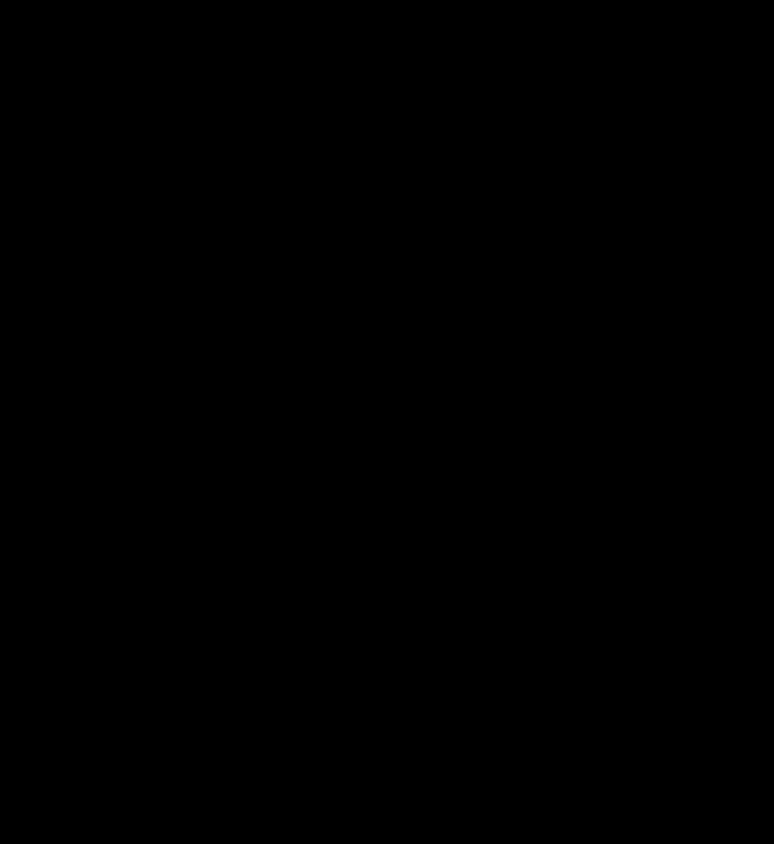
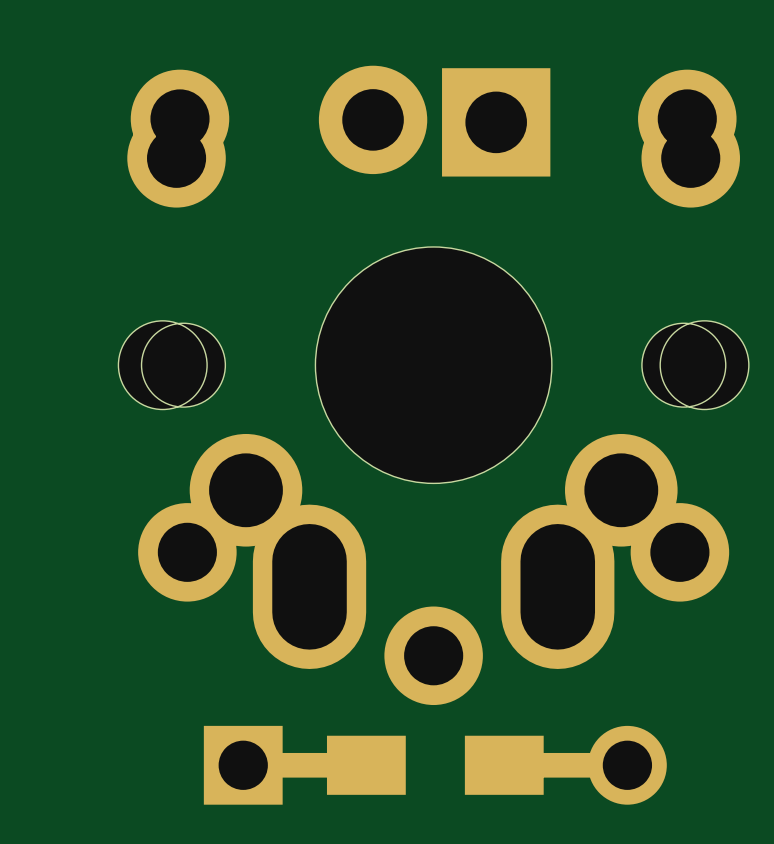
part: none -> (433, 385)
part: none -> (435, 765)

